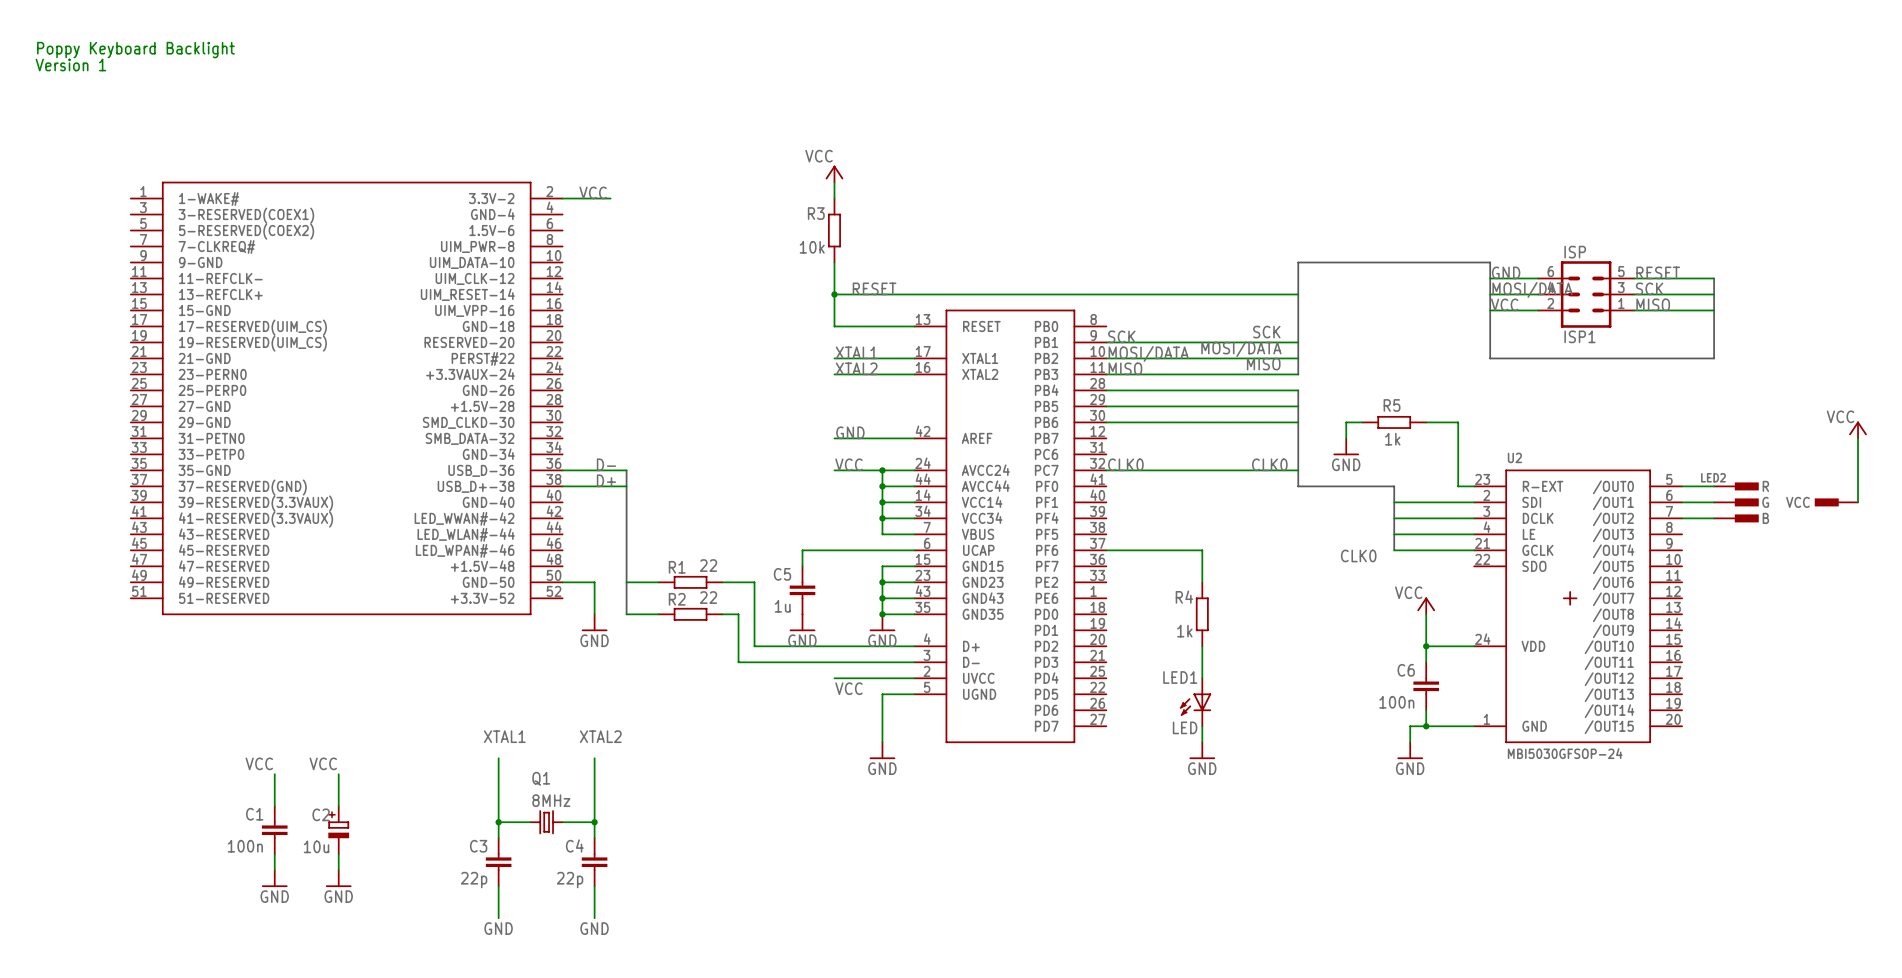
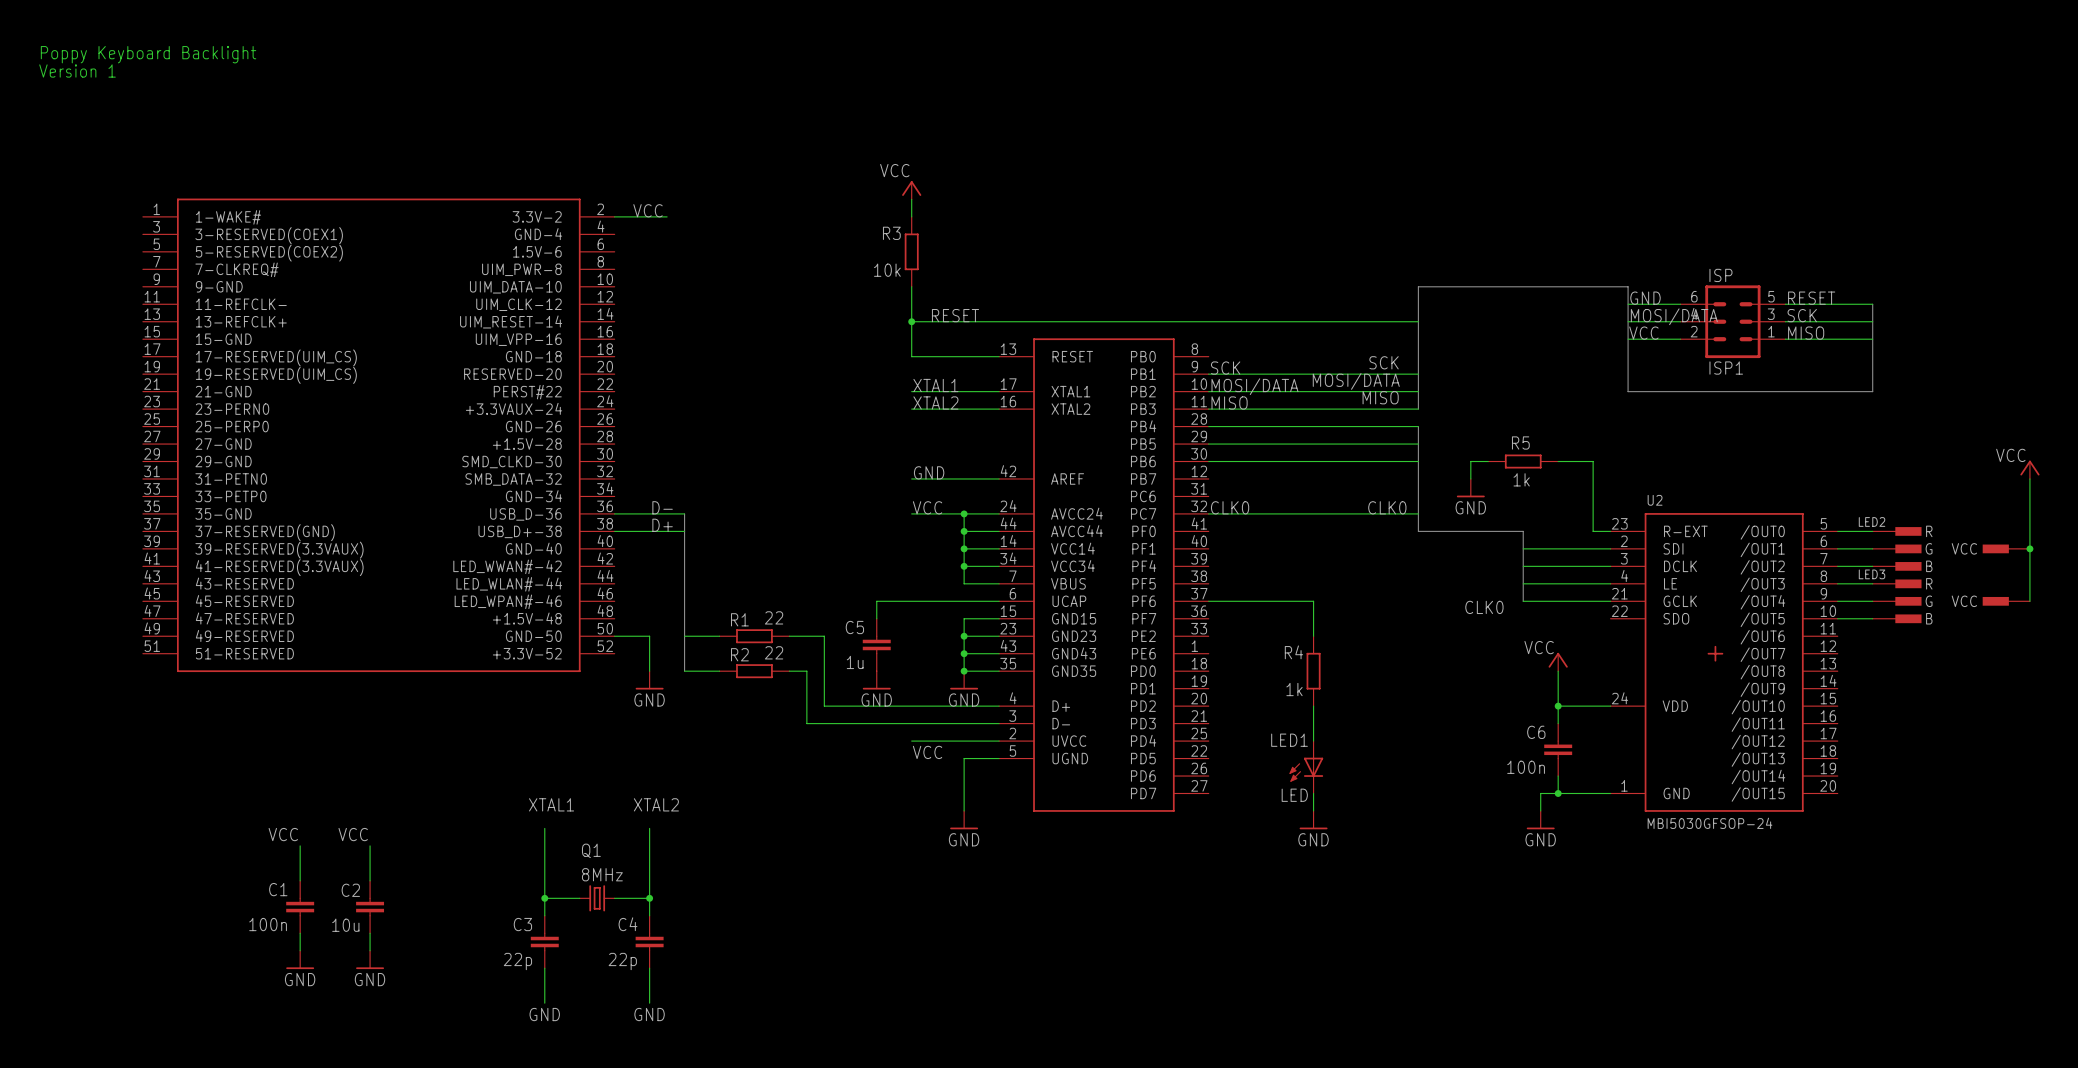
wire: none -> (2029, 548) (2029, 601)
junction: none -> (2029, 548)
wire: none -> (1837, 583) (1872, 583)
wire: none -> (1837, 601) (1872, 601)
LED3: none -> (1951, 601)
wire: none -> (1837, 618) (1872, 618)
C2 symbol: [328, 806, 350, 855] -> [356, 880, 385, 934]

